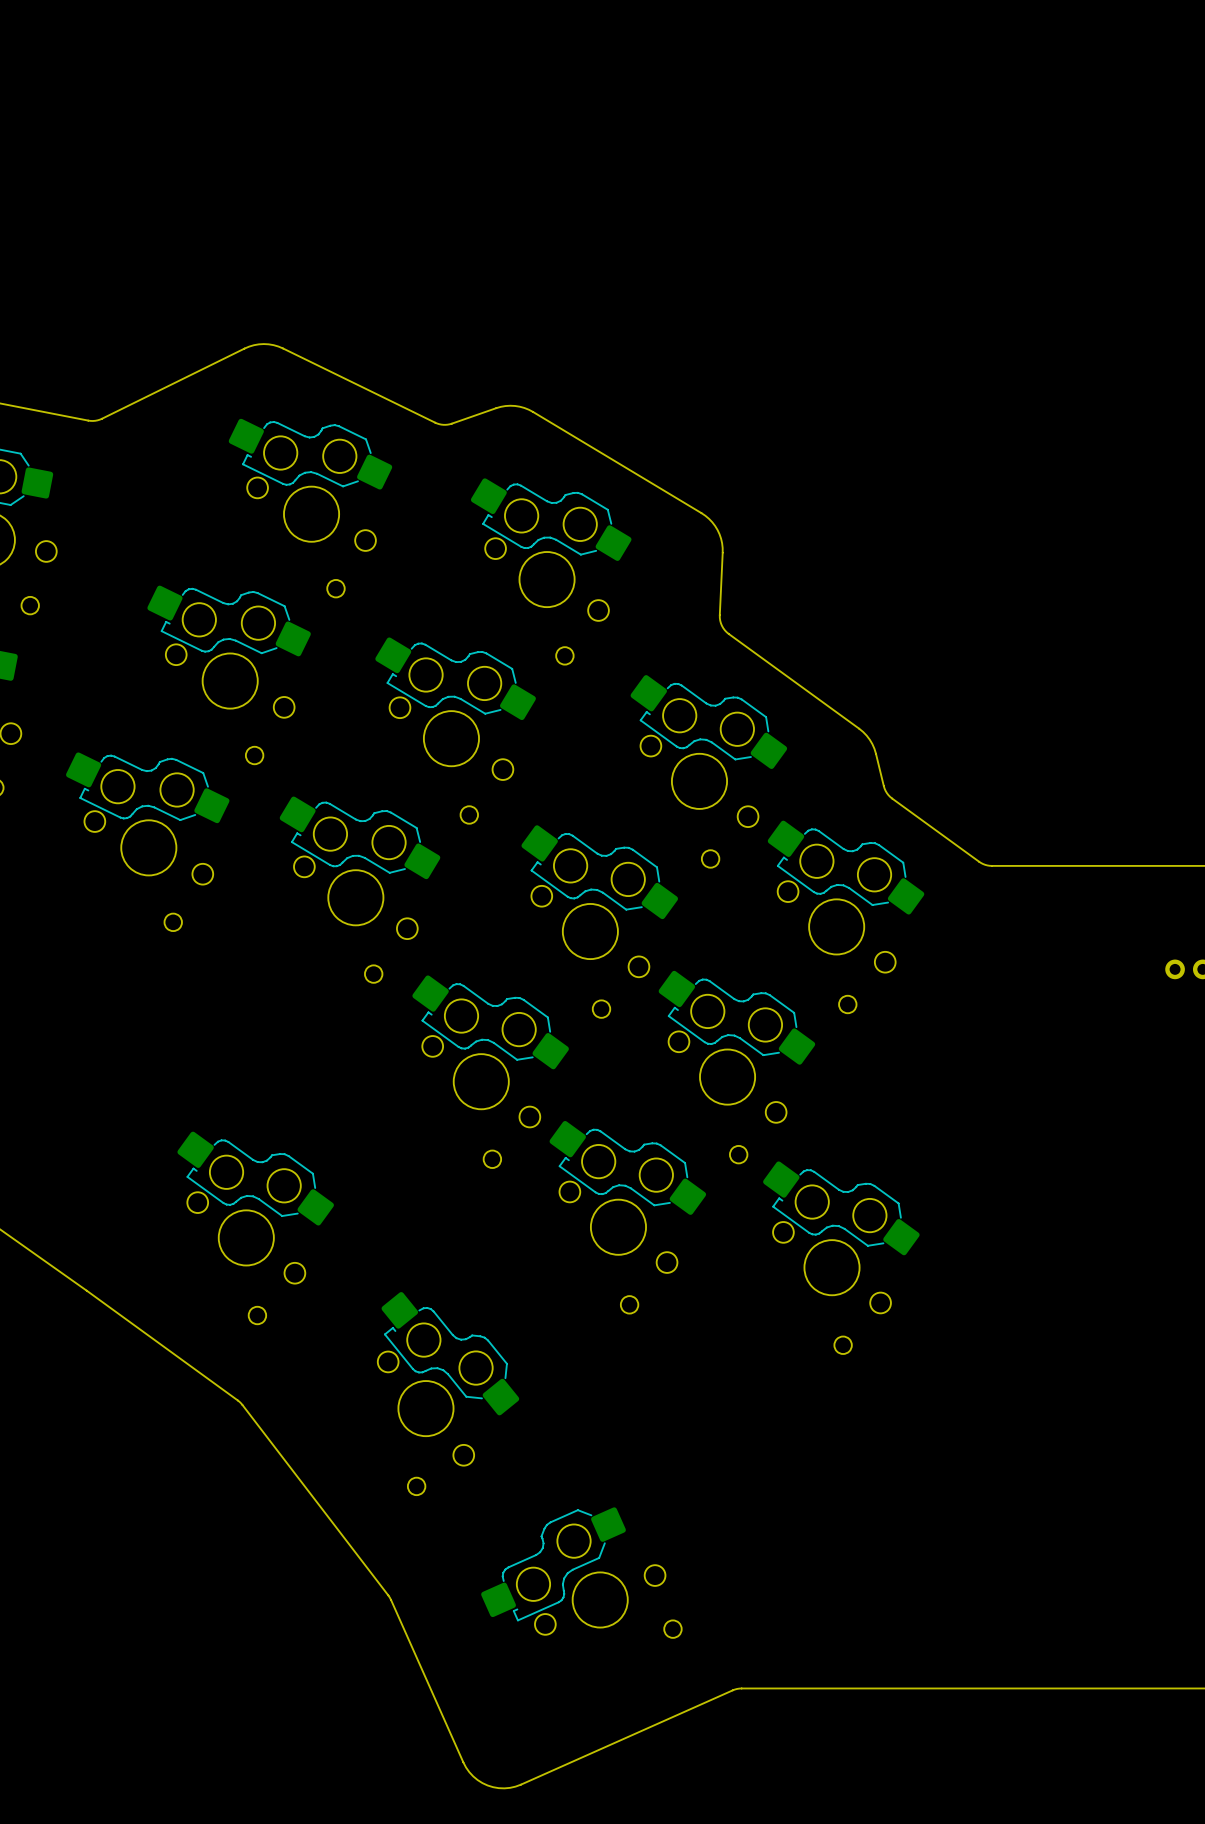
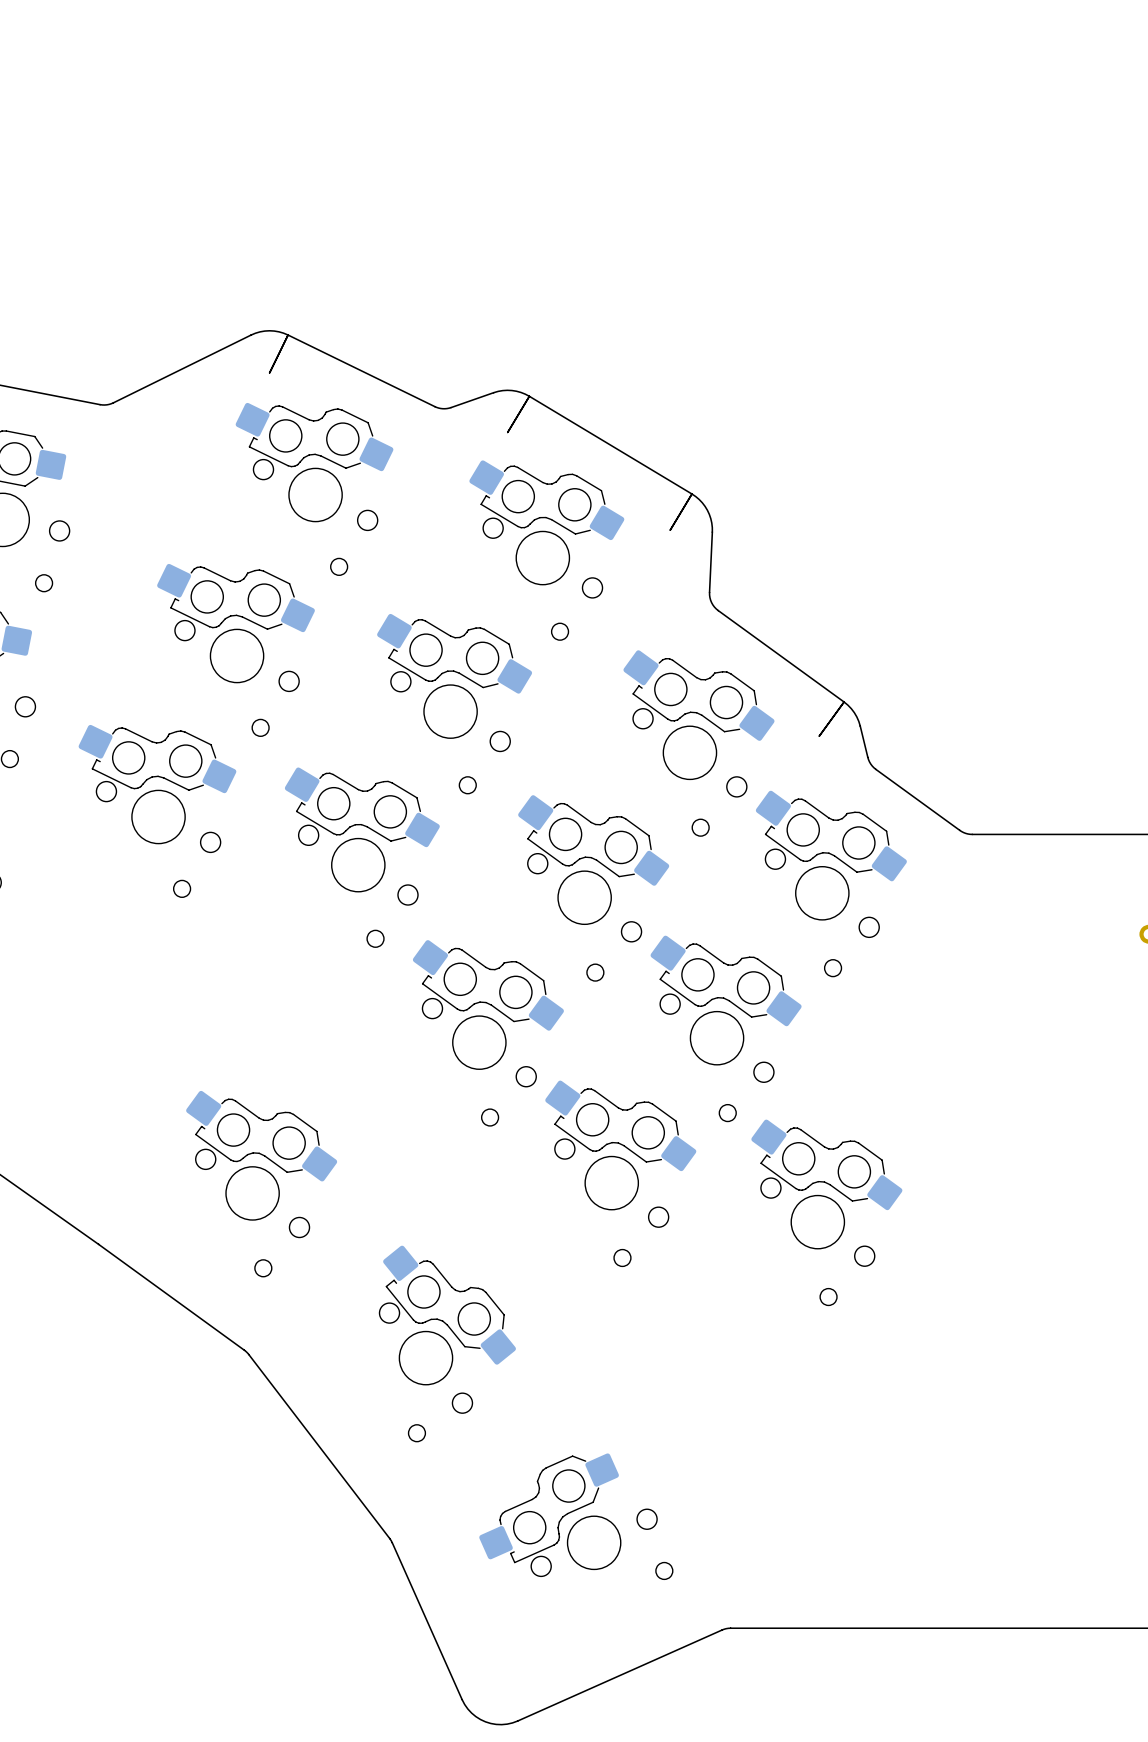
board edge: none -> (288, 335) (269, 372) (288, 335)
board edge: none -> (529, 396) (507, 432) (529, 396)
board edge: none -> (691, 494) (670, 530) (691, 494)
board edge: none -> (844, 702) (819, 736) (844, 702)

